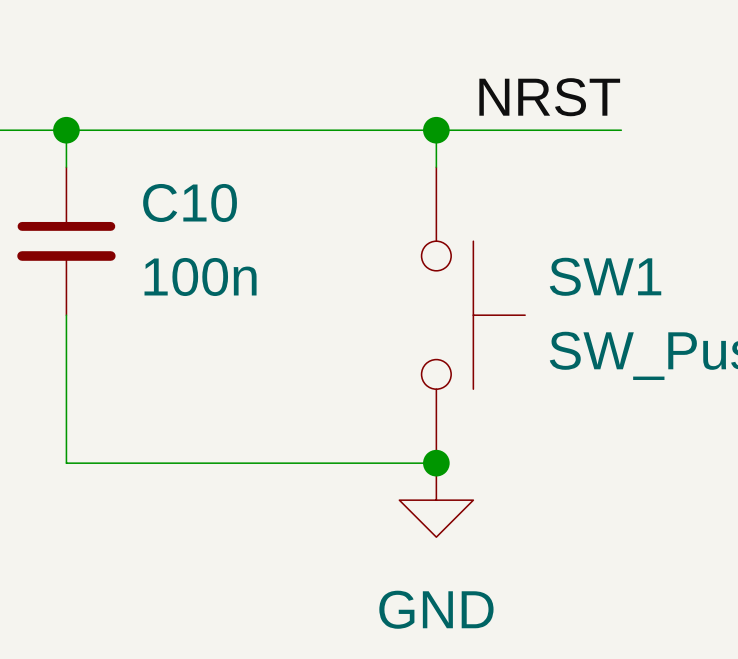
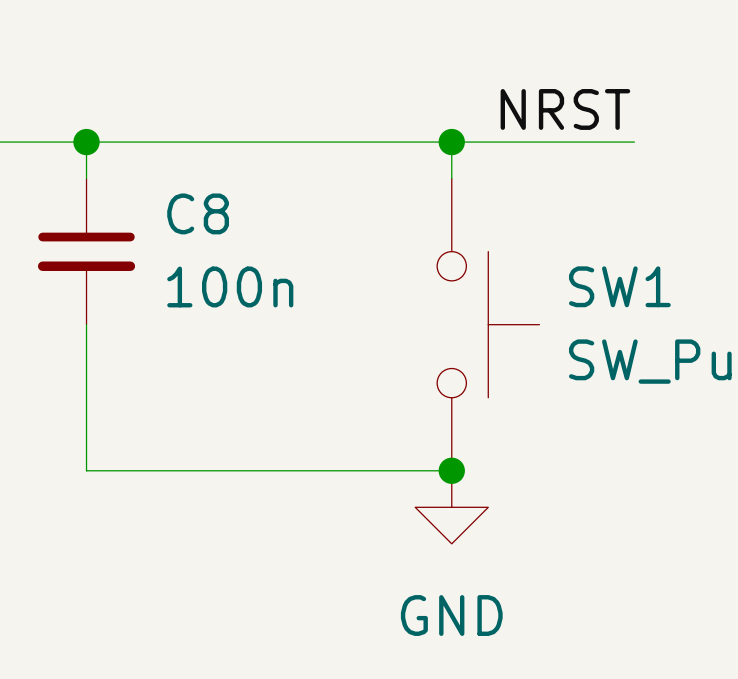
C10 name: C10 (190, 203) -> C8 (198, 213)

